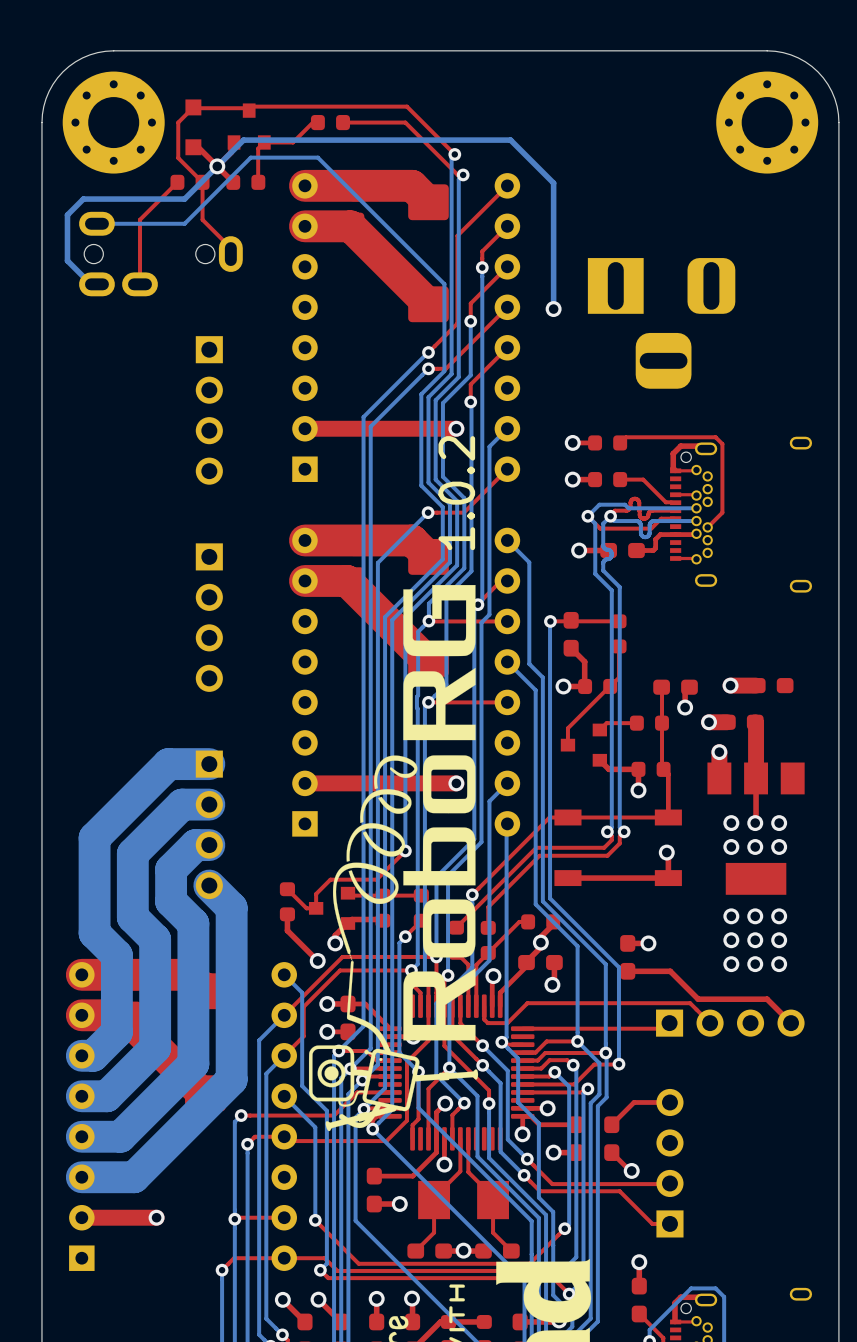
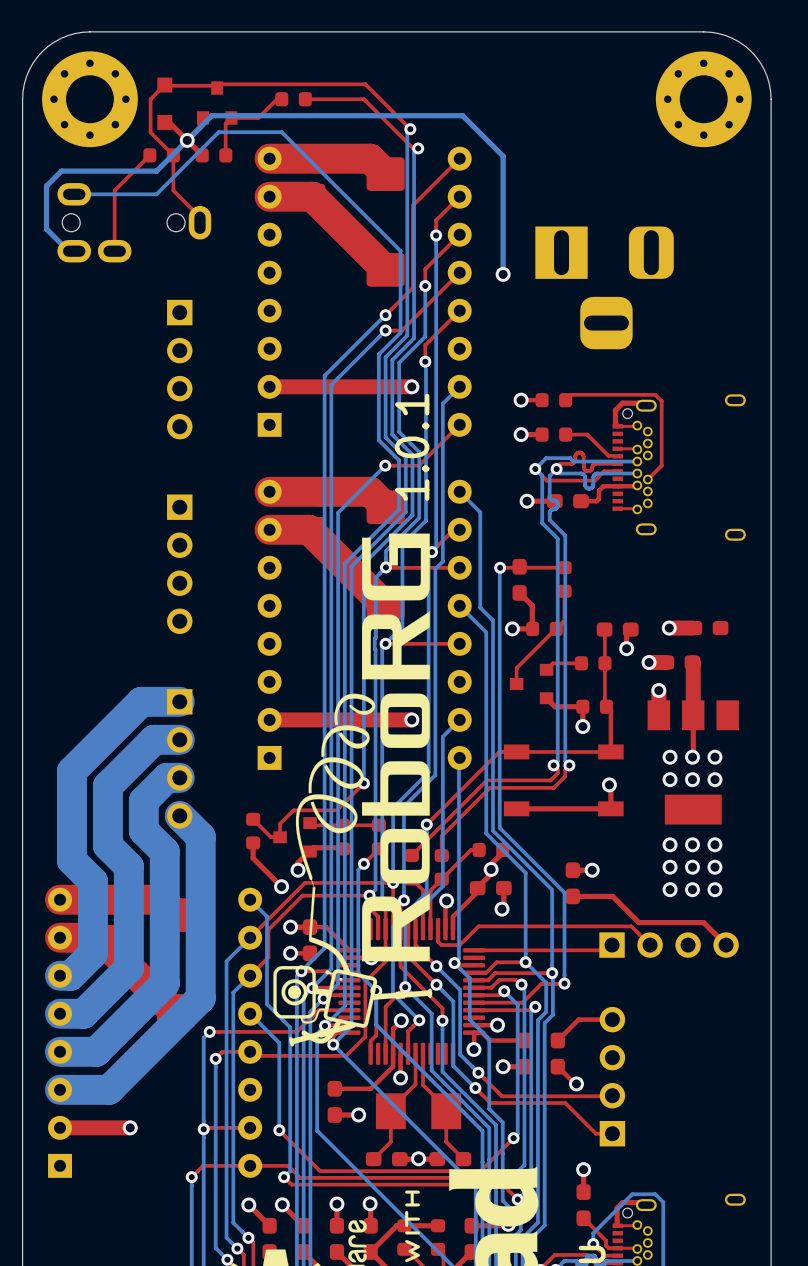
text: 1.0.2 (456, 493) -> 1.0.1 (412, 447)

